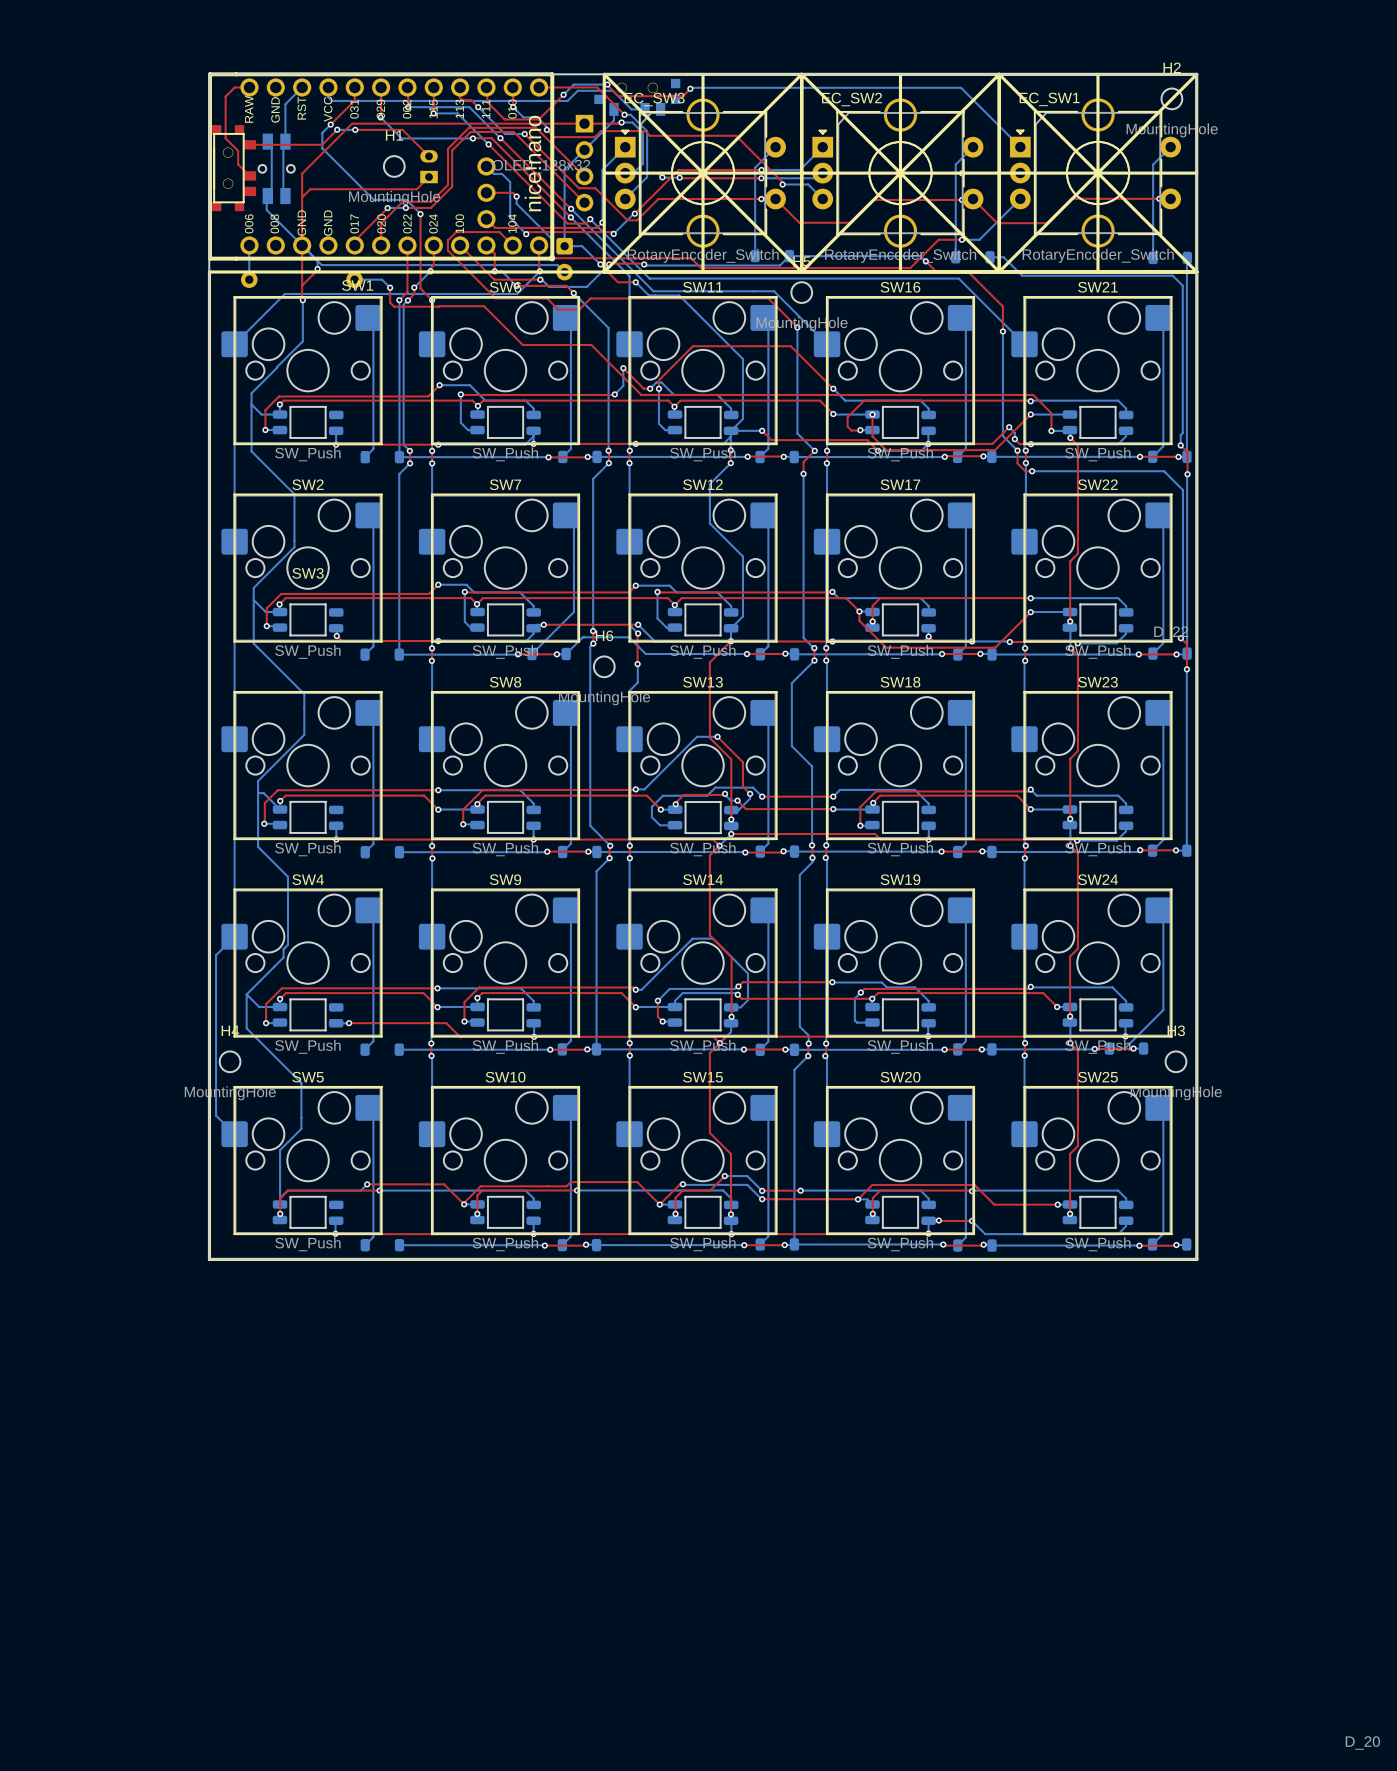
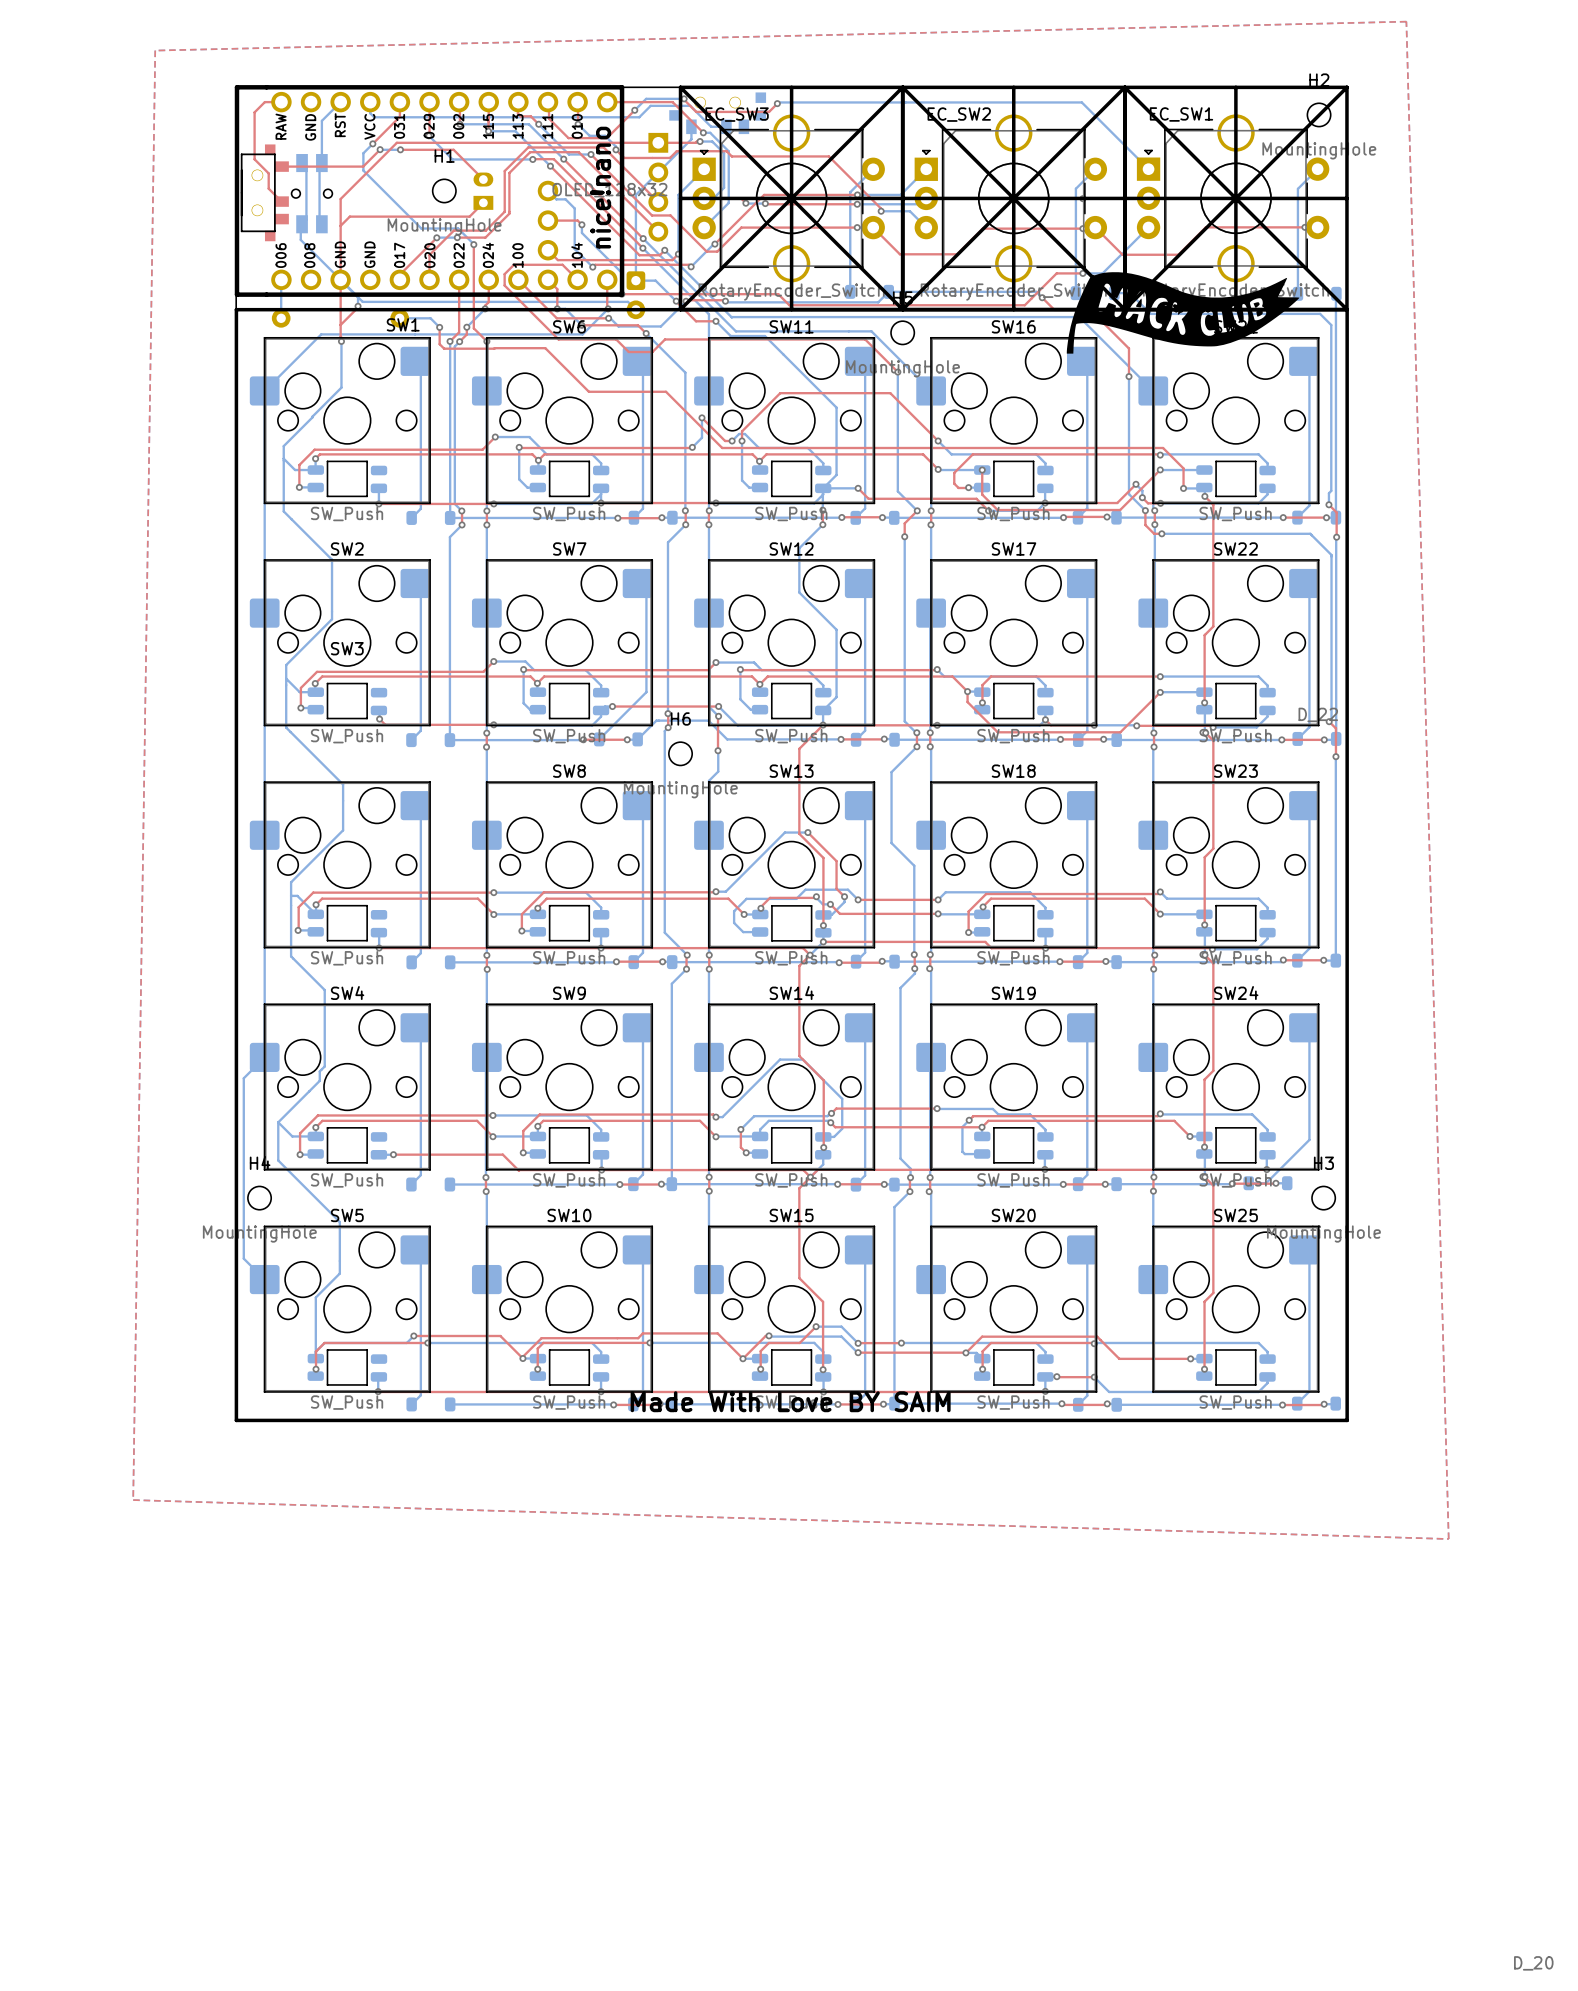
top zone outline: none -> (1406, 21) (155, 50) (133, 1500) (1448, 1539) (1406, 21)
part footprint: [212, 125, 257, 212] -> [240, 144, 289, 242]
part: none -> (1183, 312)
text: none -> Made With Love BY SAIM (790, 1401)

